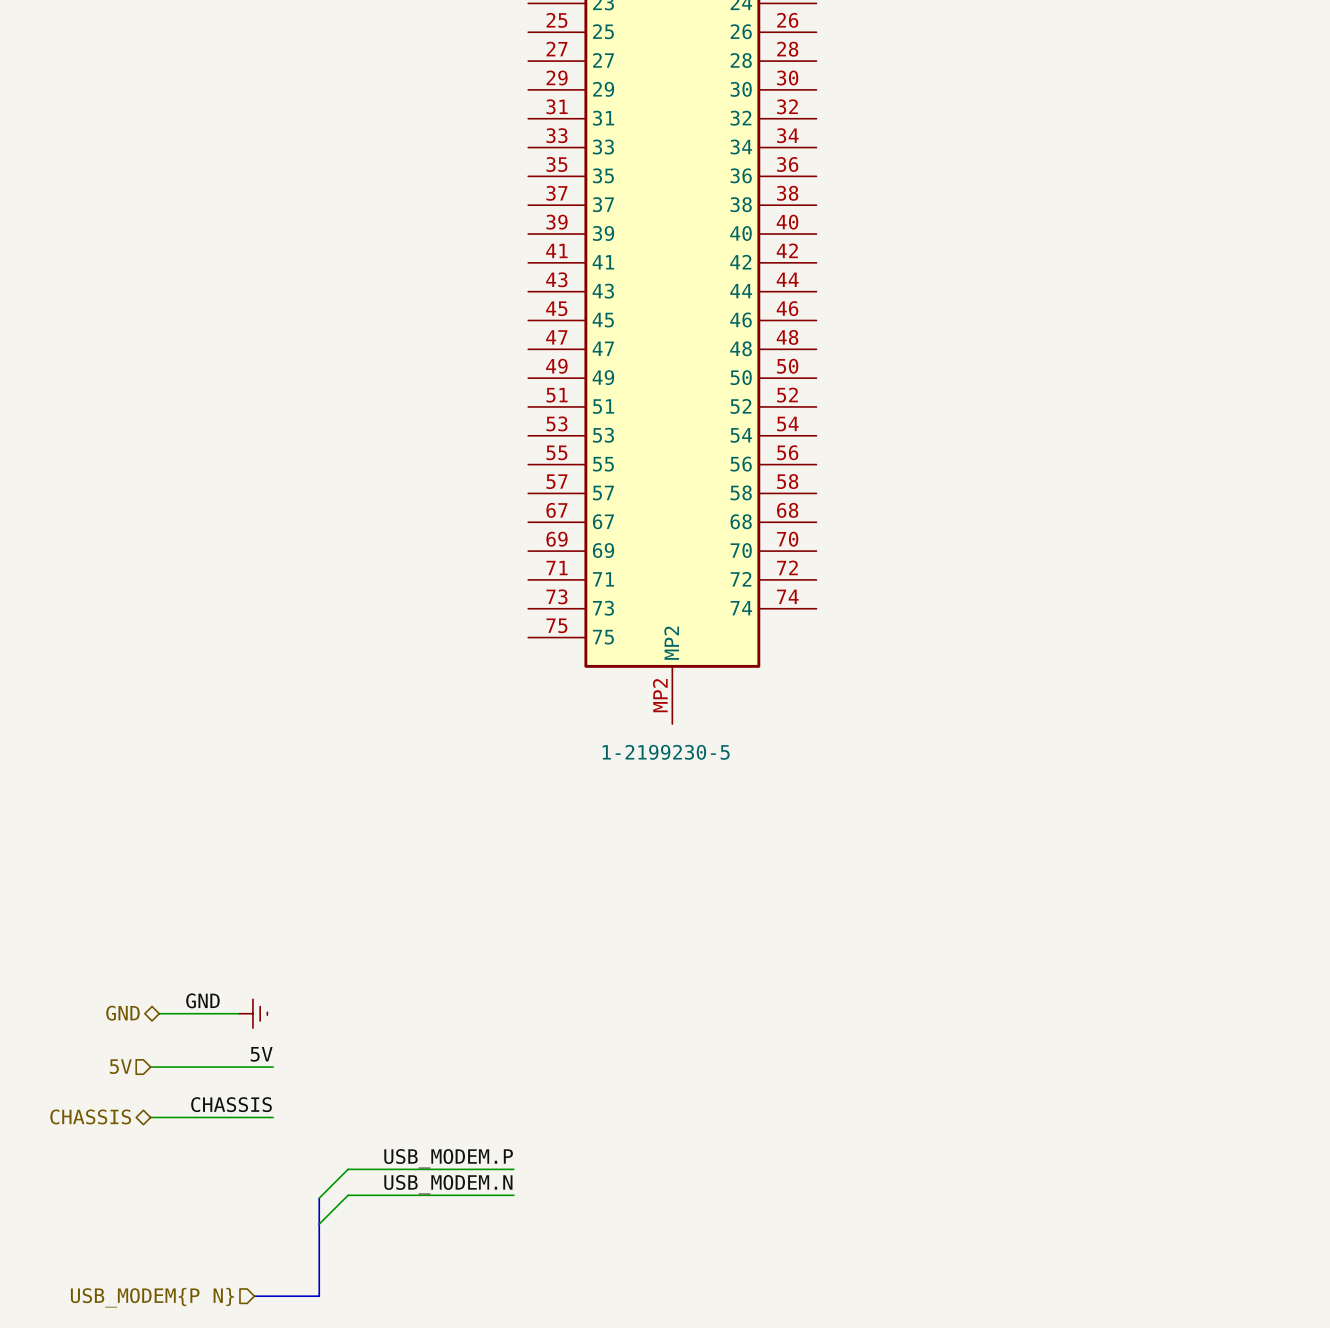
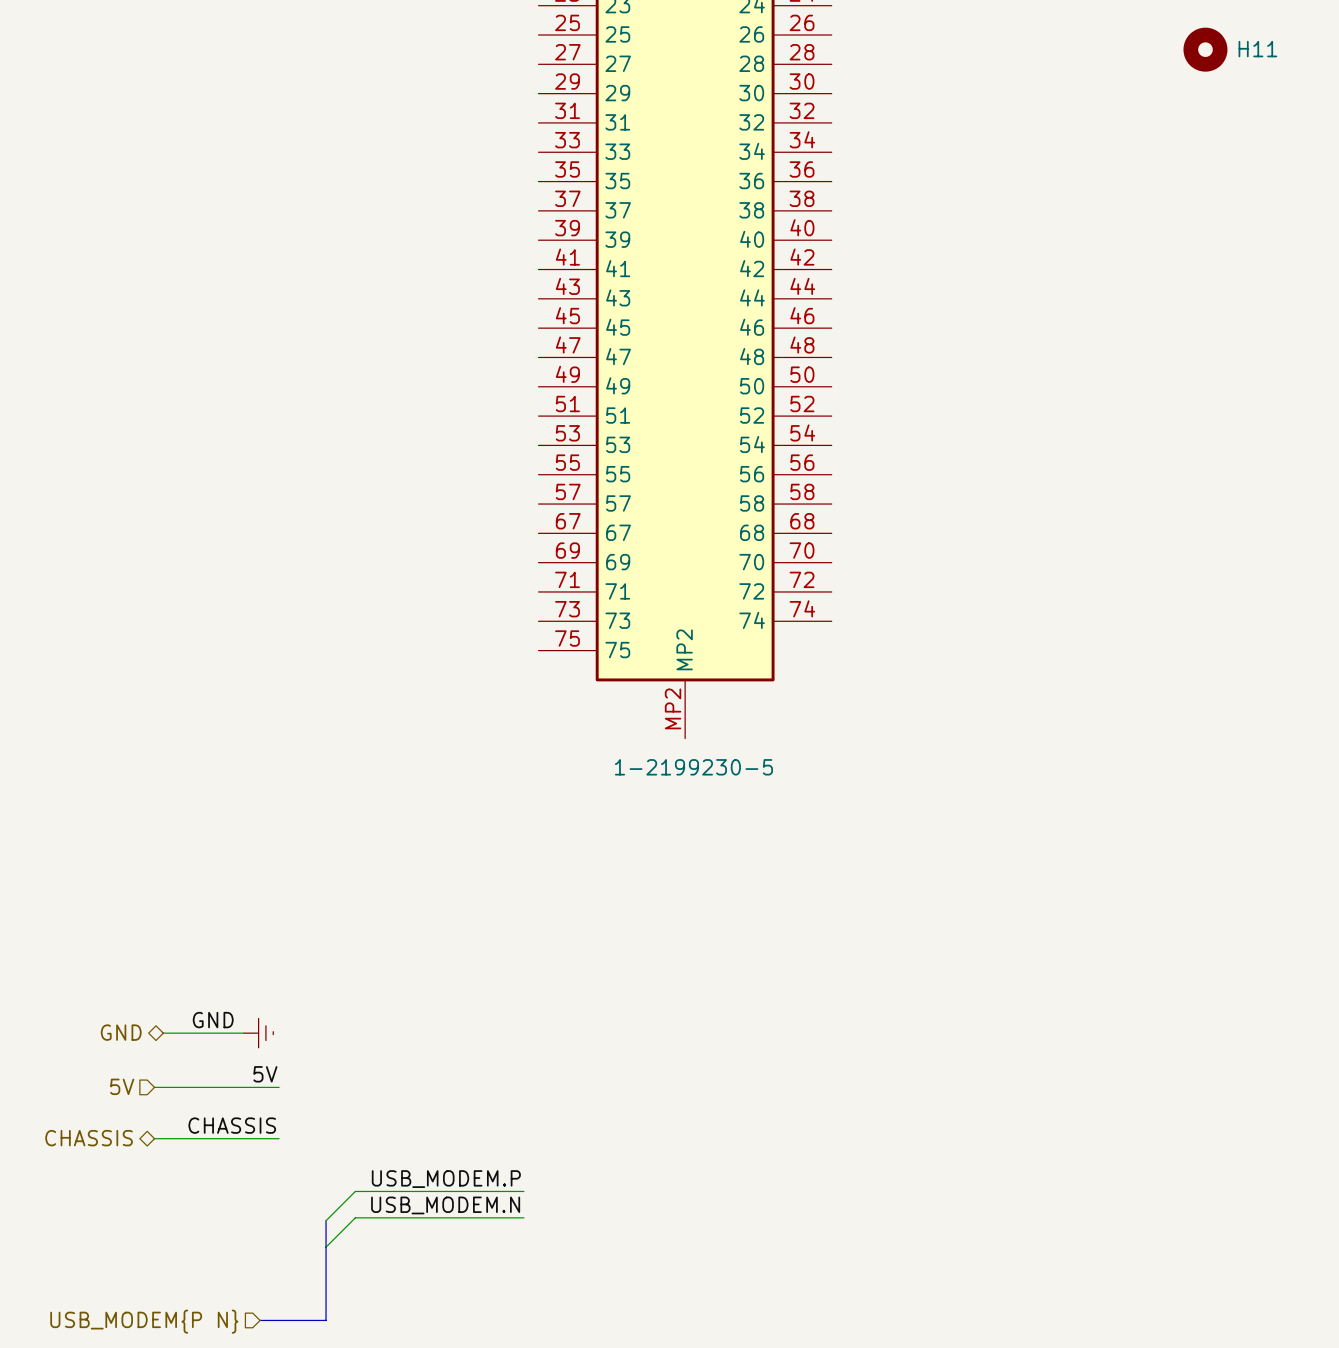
H11: none -> (1205, 49)

